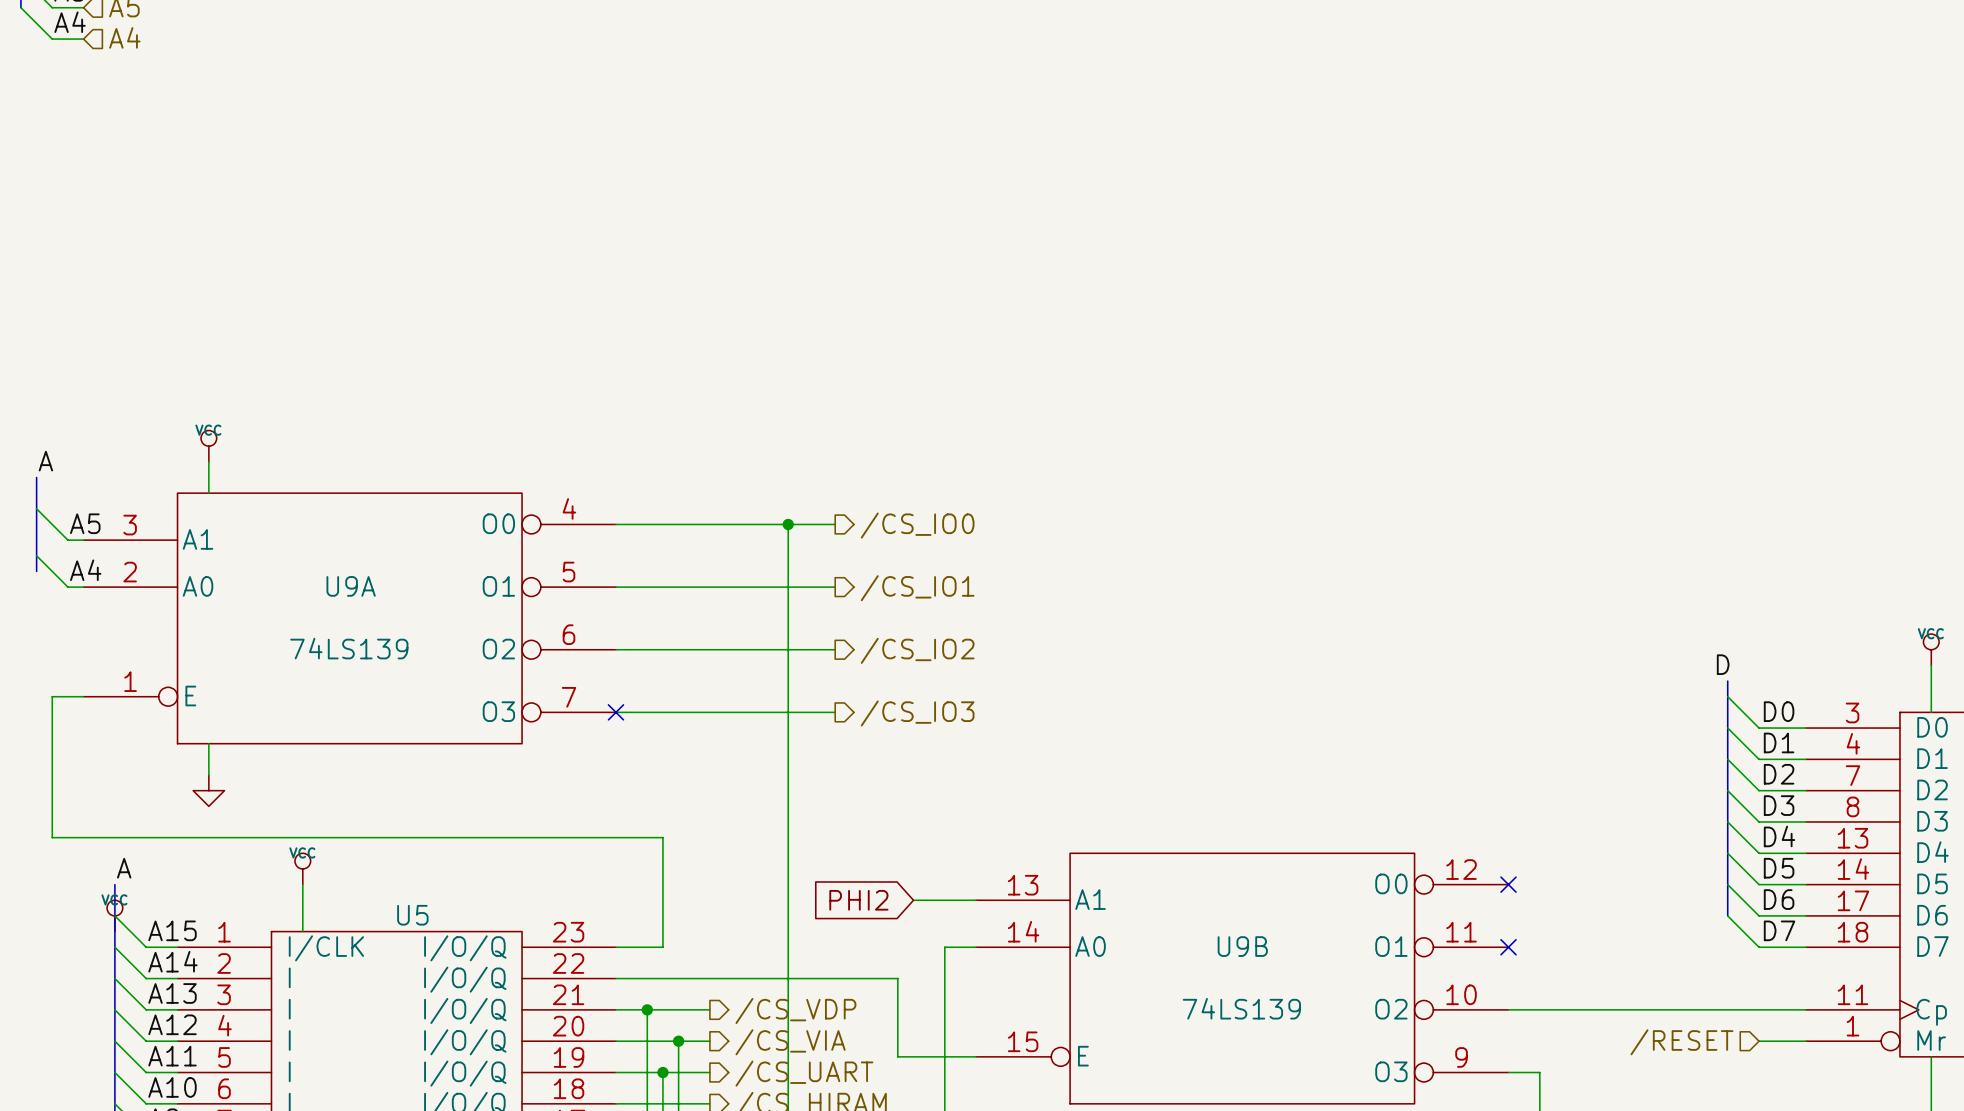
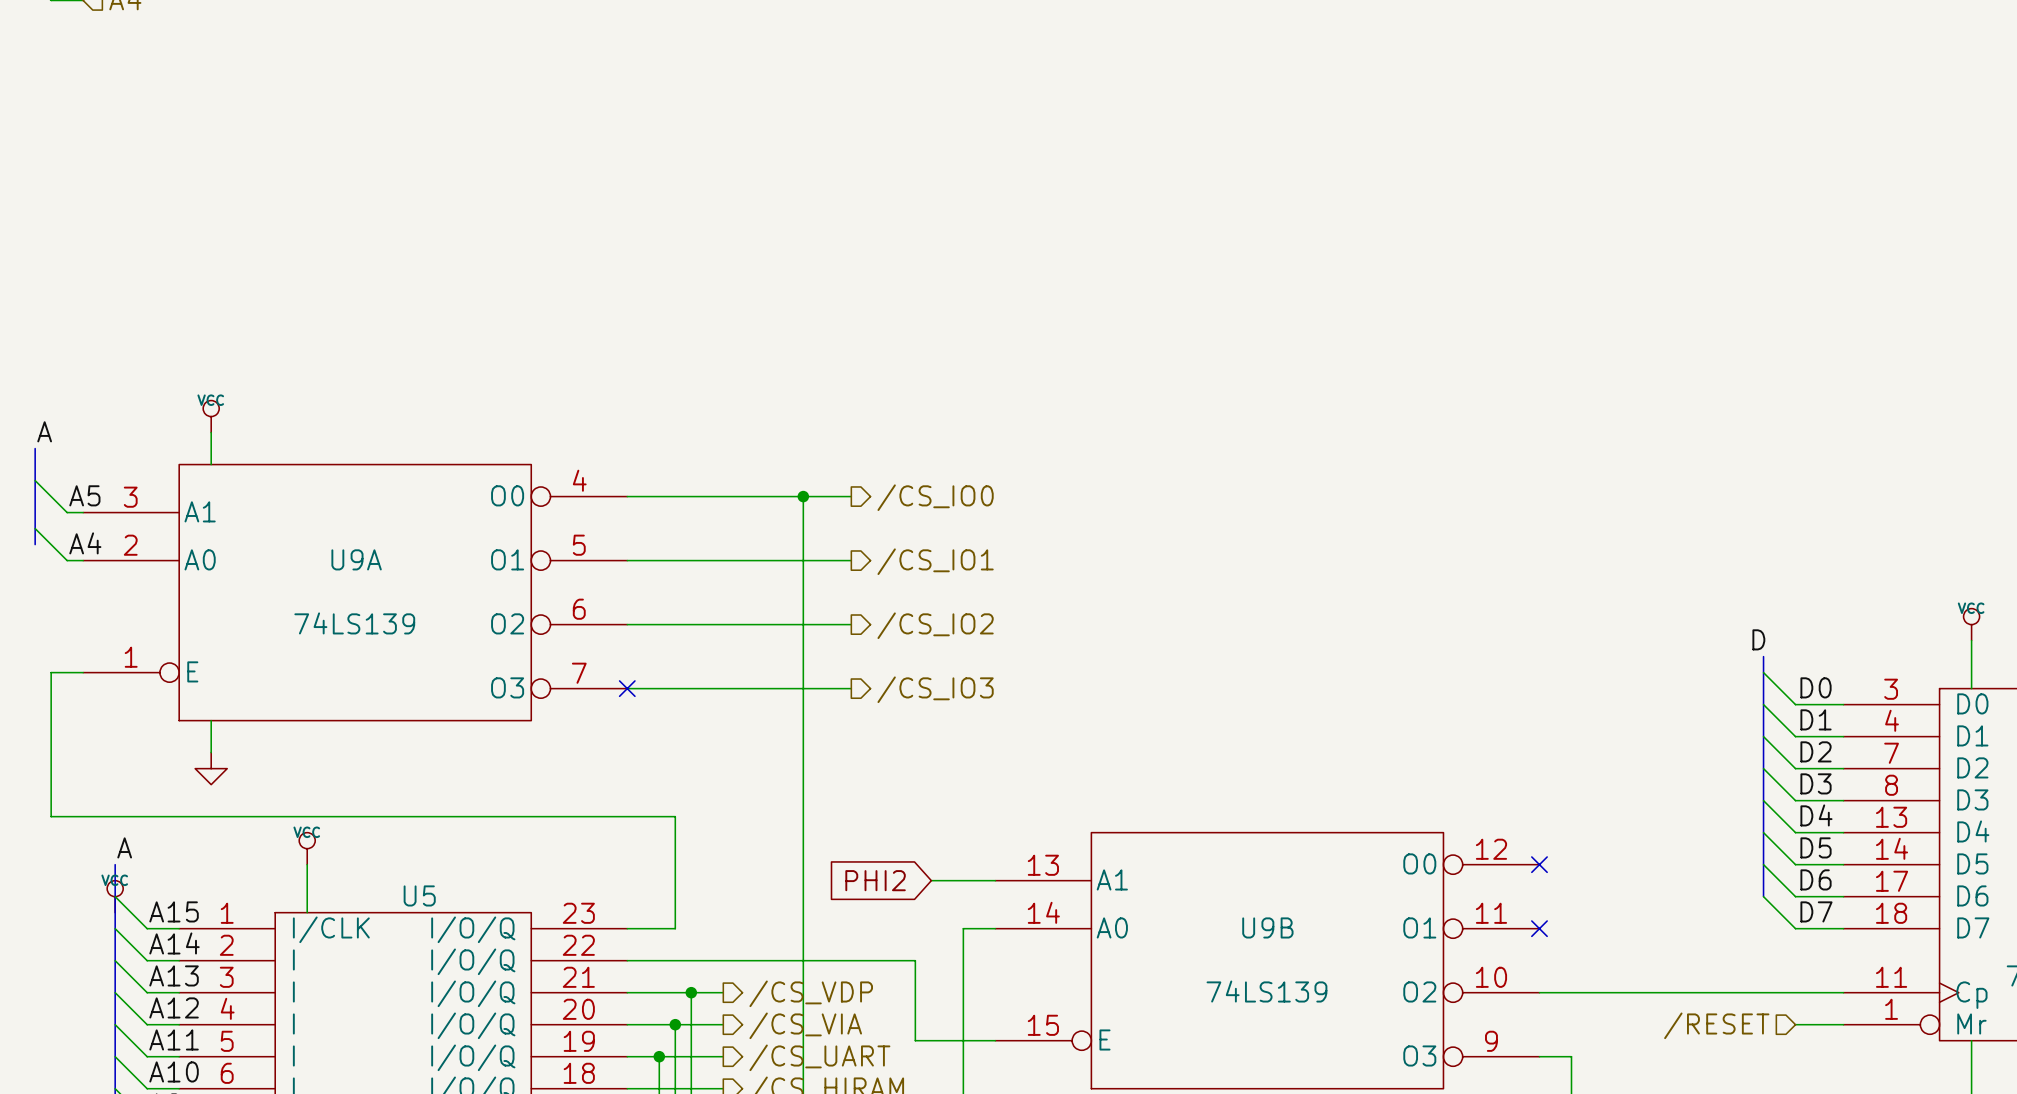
wire: (647, 1009) (647, 1072) -> none
junction: (647, 1009) -> none
wire: none -> (691, 992) (691, 1024)
junction: none -> (691, 992)
wire: none -> (675, 1024) (675, 1056)
junction: none -> (675, 1024)
junction: (678, 1041) -> none
junction: none -> (659, 1056)
junction: (662, 1072) -> none

